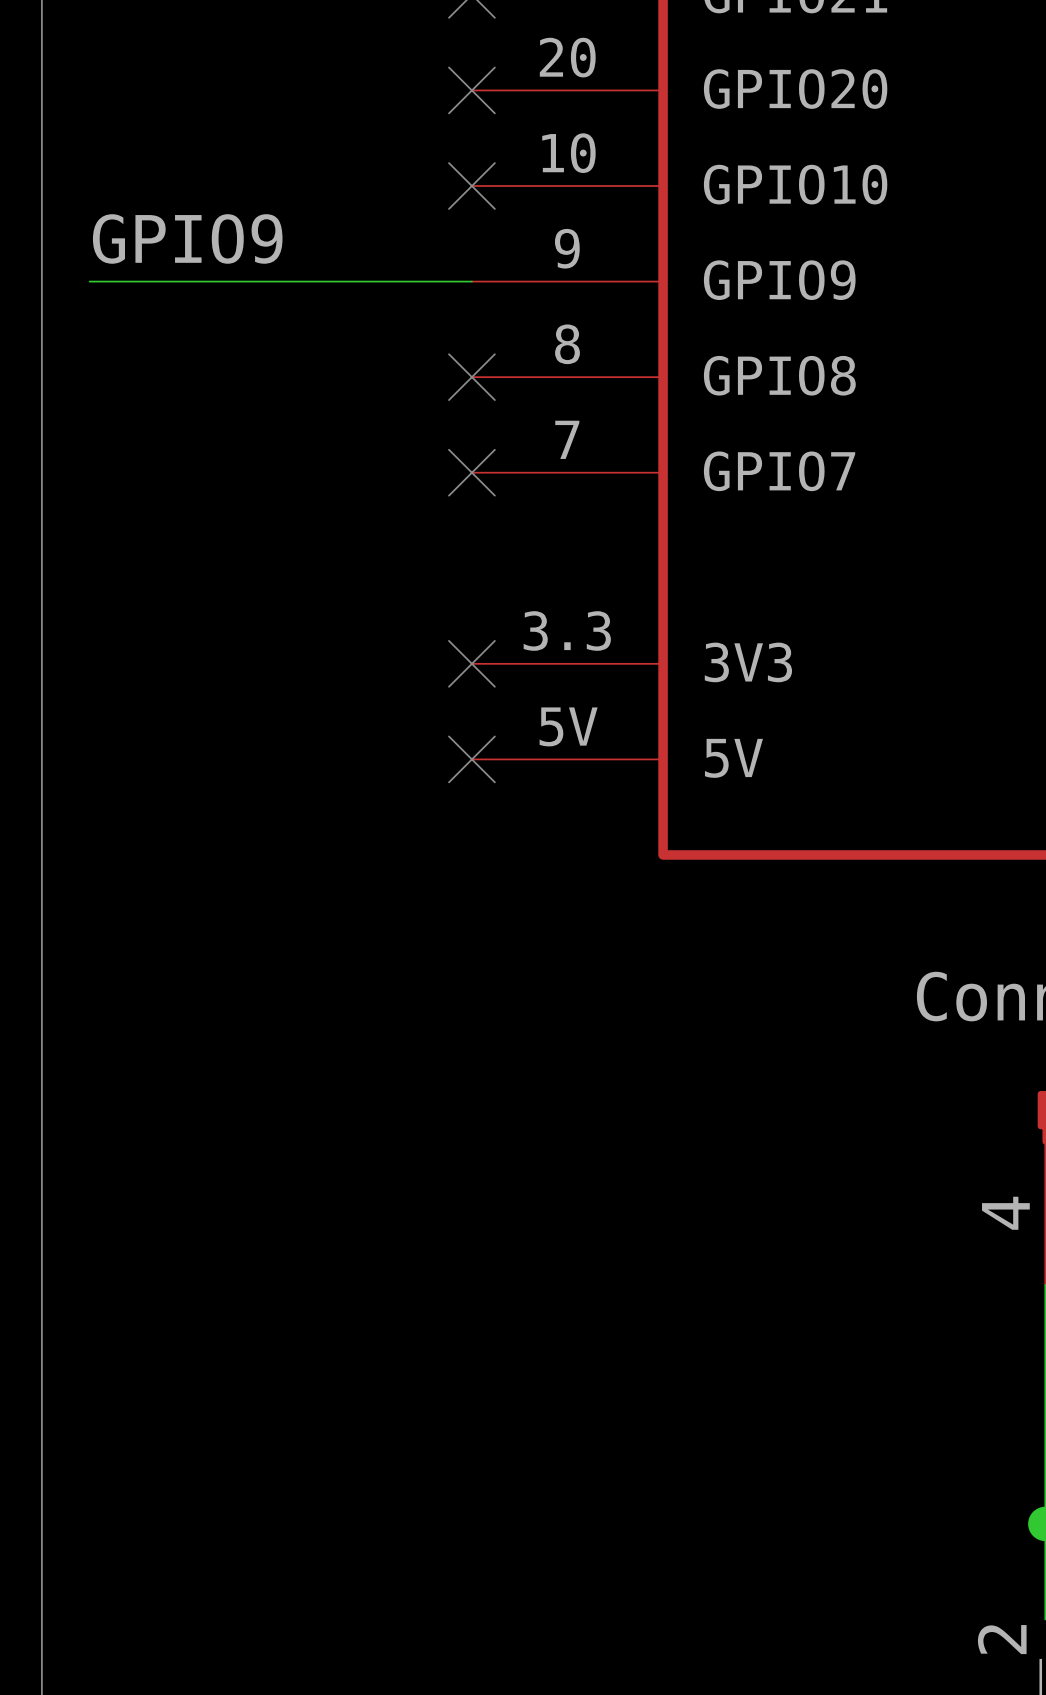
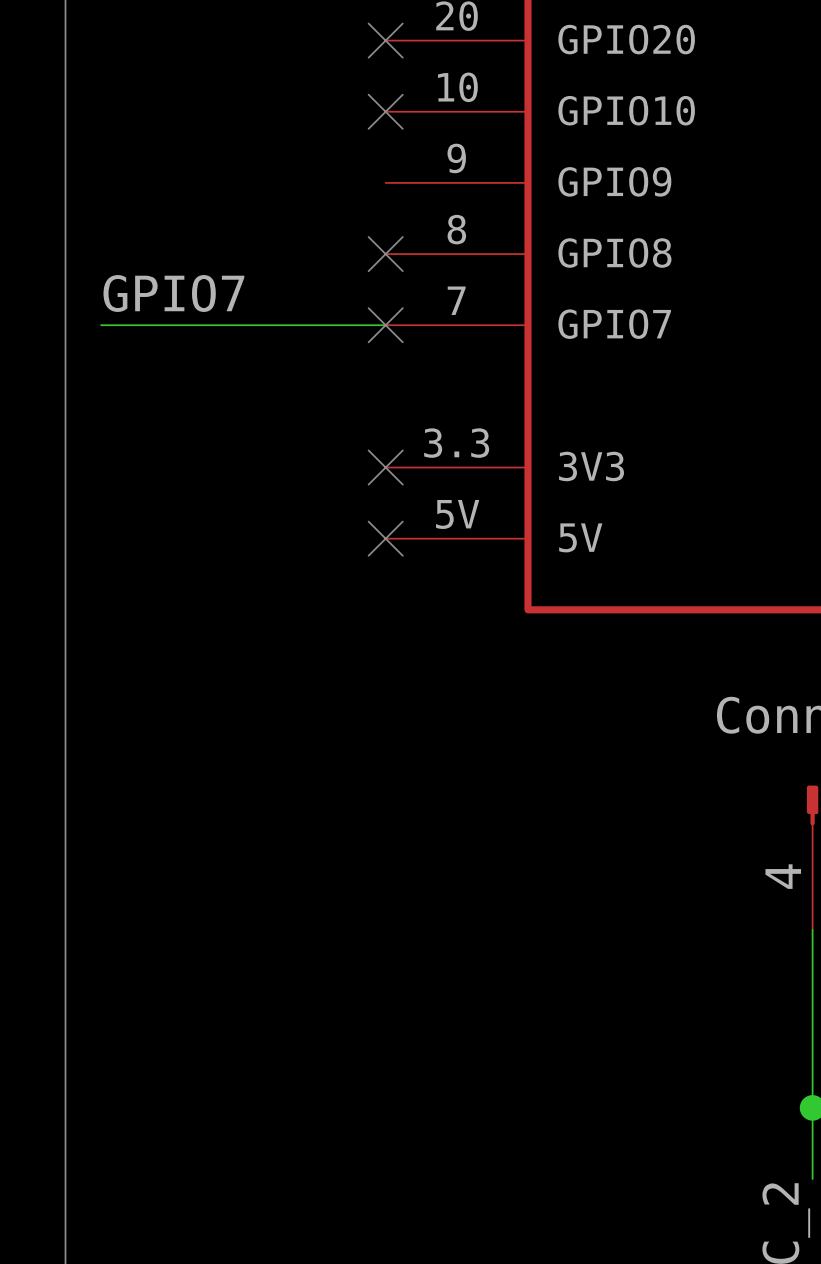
label: GPIO9 (187, 238) -> none
wire: (89, 281) (471, 281) -> (101, 325) (385, 325)
label: none -> GPIO7 (173, 293)

